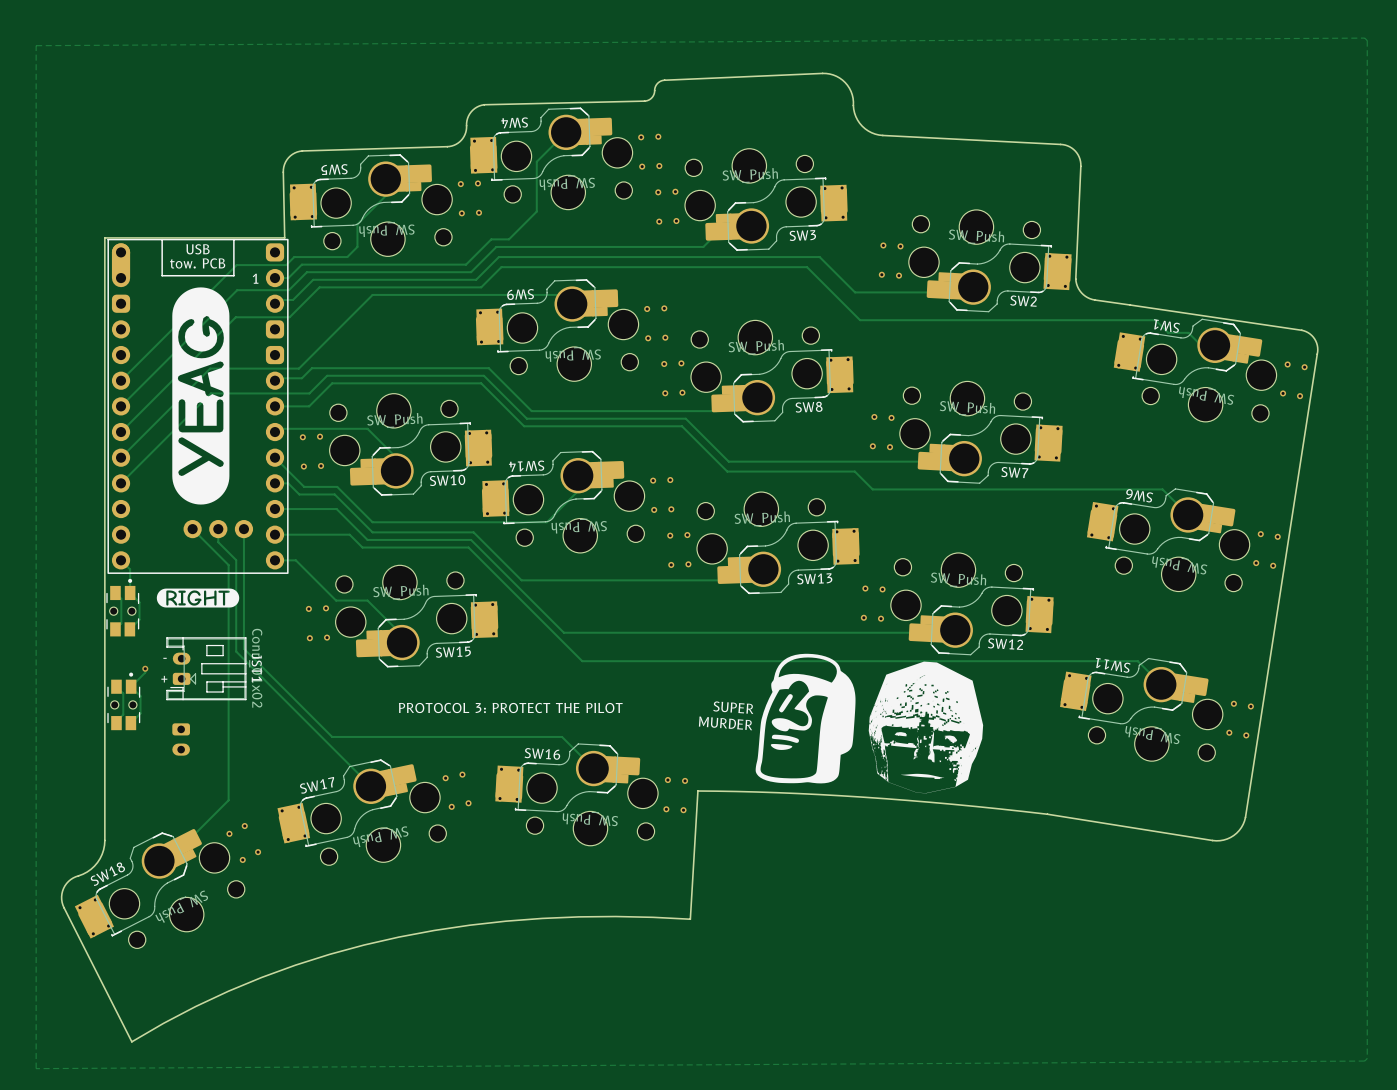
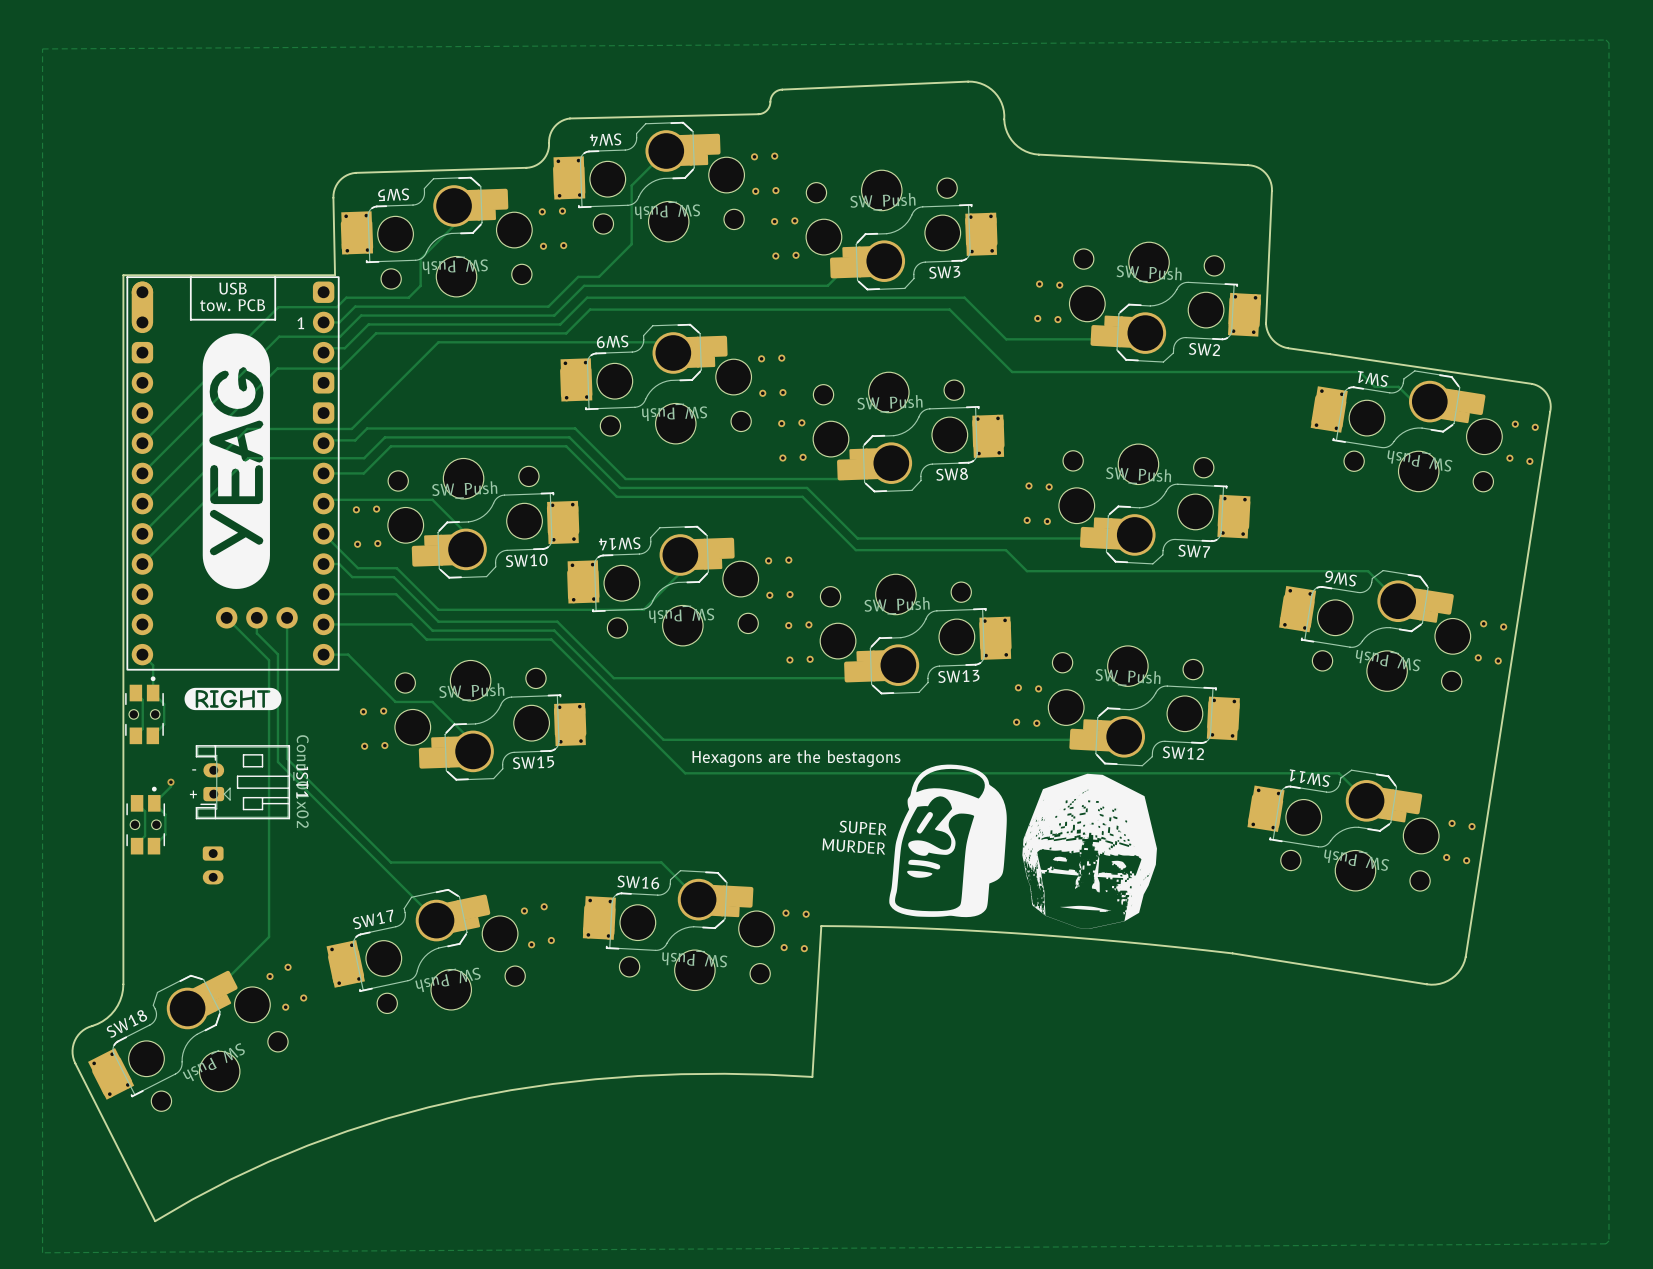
text: none -> Hexagons are the bestagons (796, 758)
text: PROTOCOL 3: PROTECT THE PILOT (510, 707) -> none

